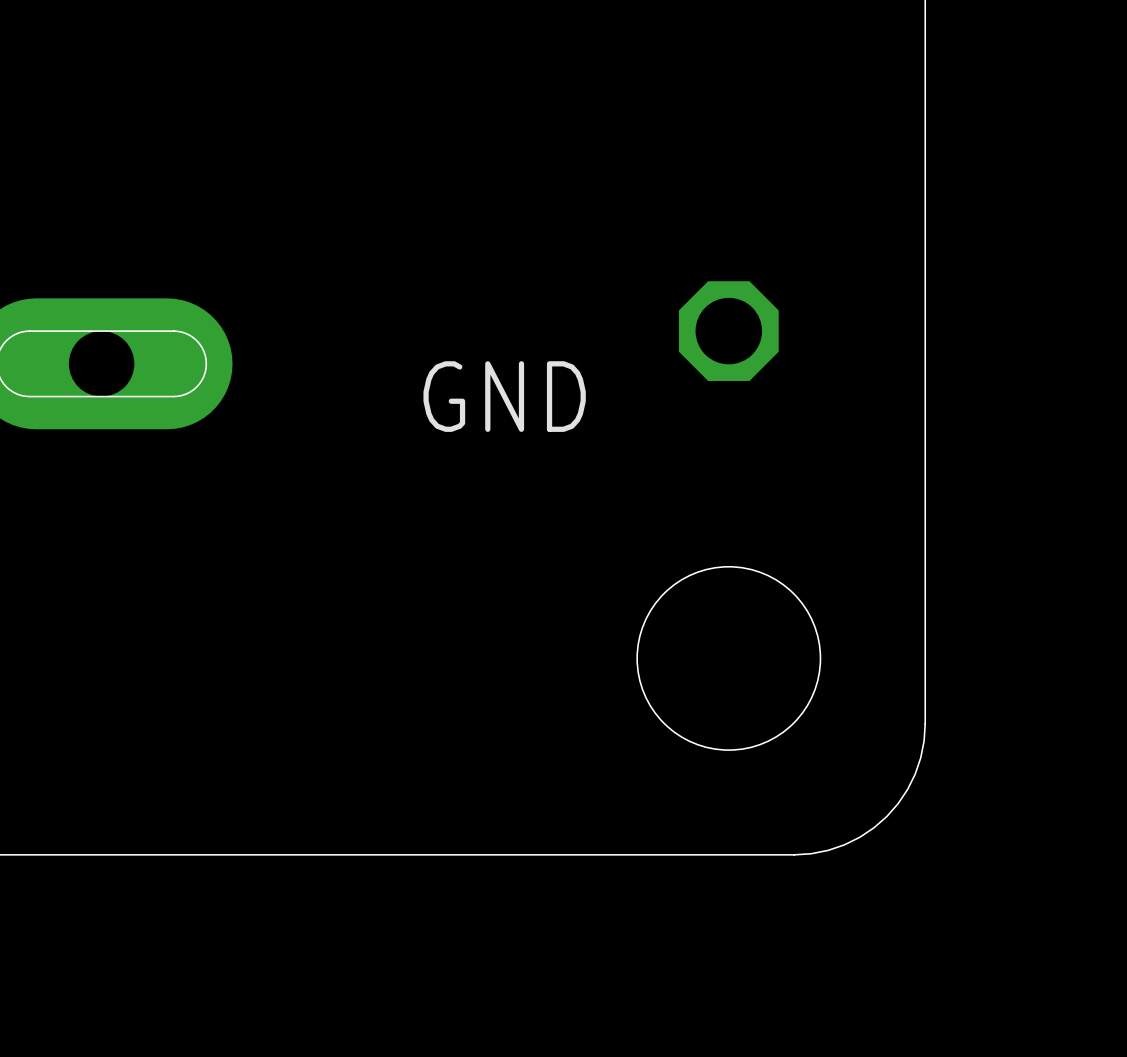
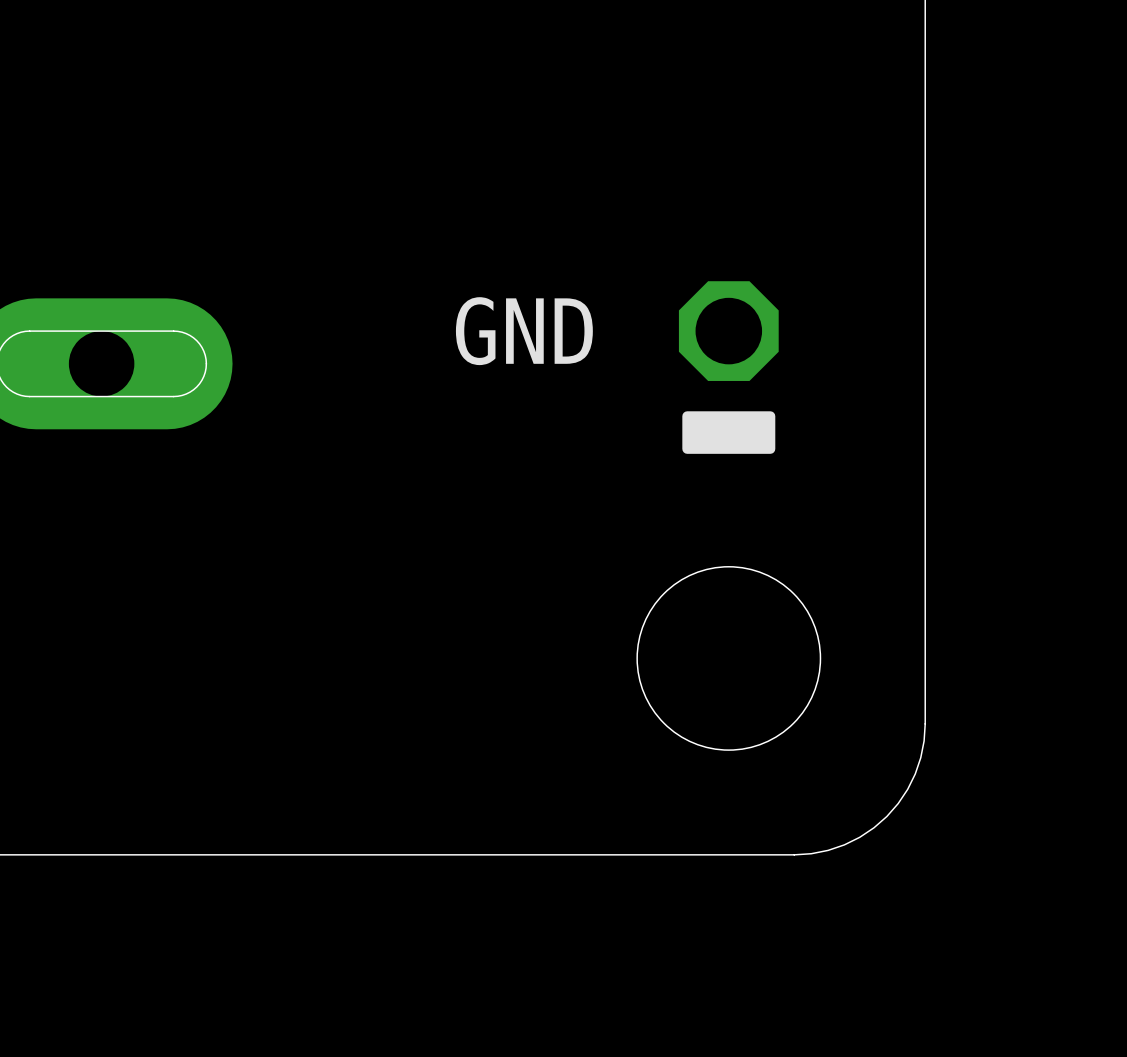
text position: GND (504, 396) -> GND (524, 331)
drawing: none -> [682, 411, 776, 454]

